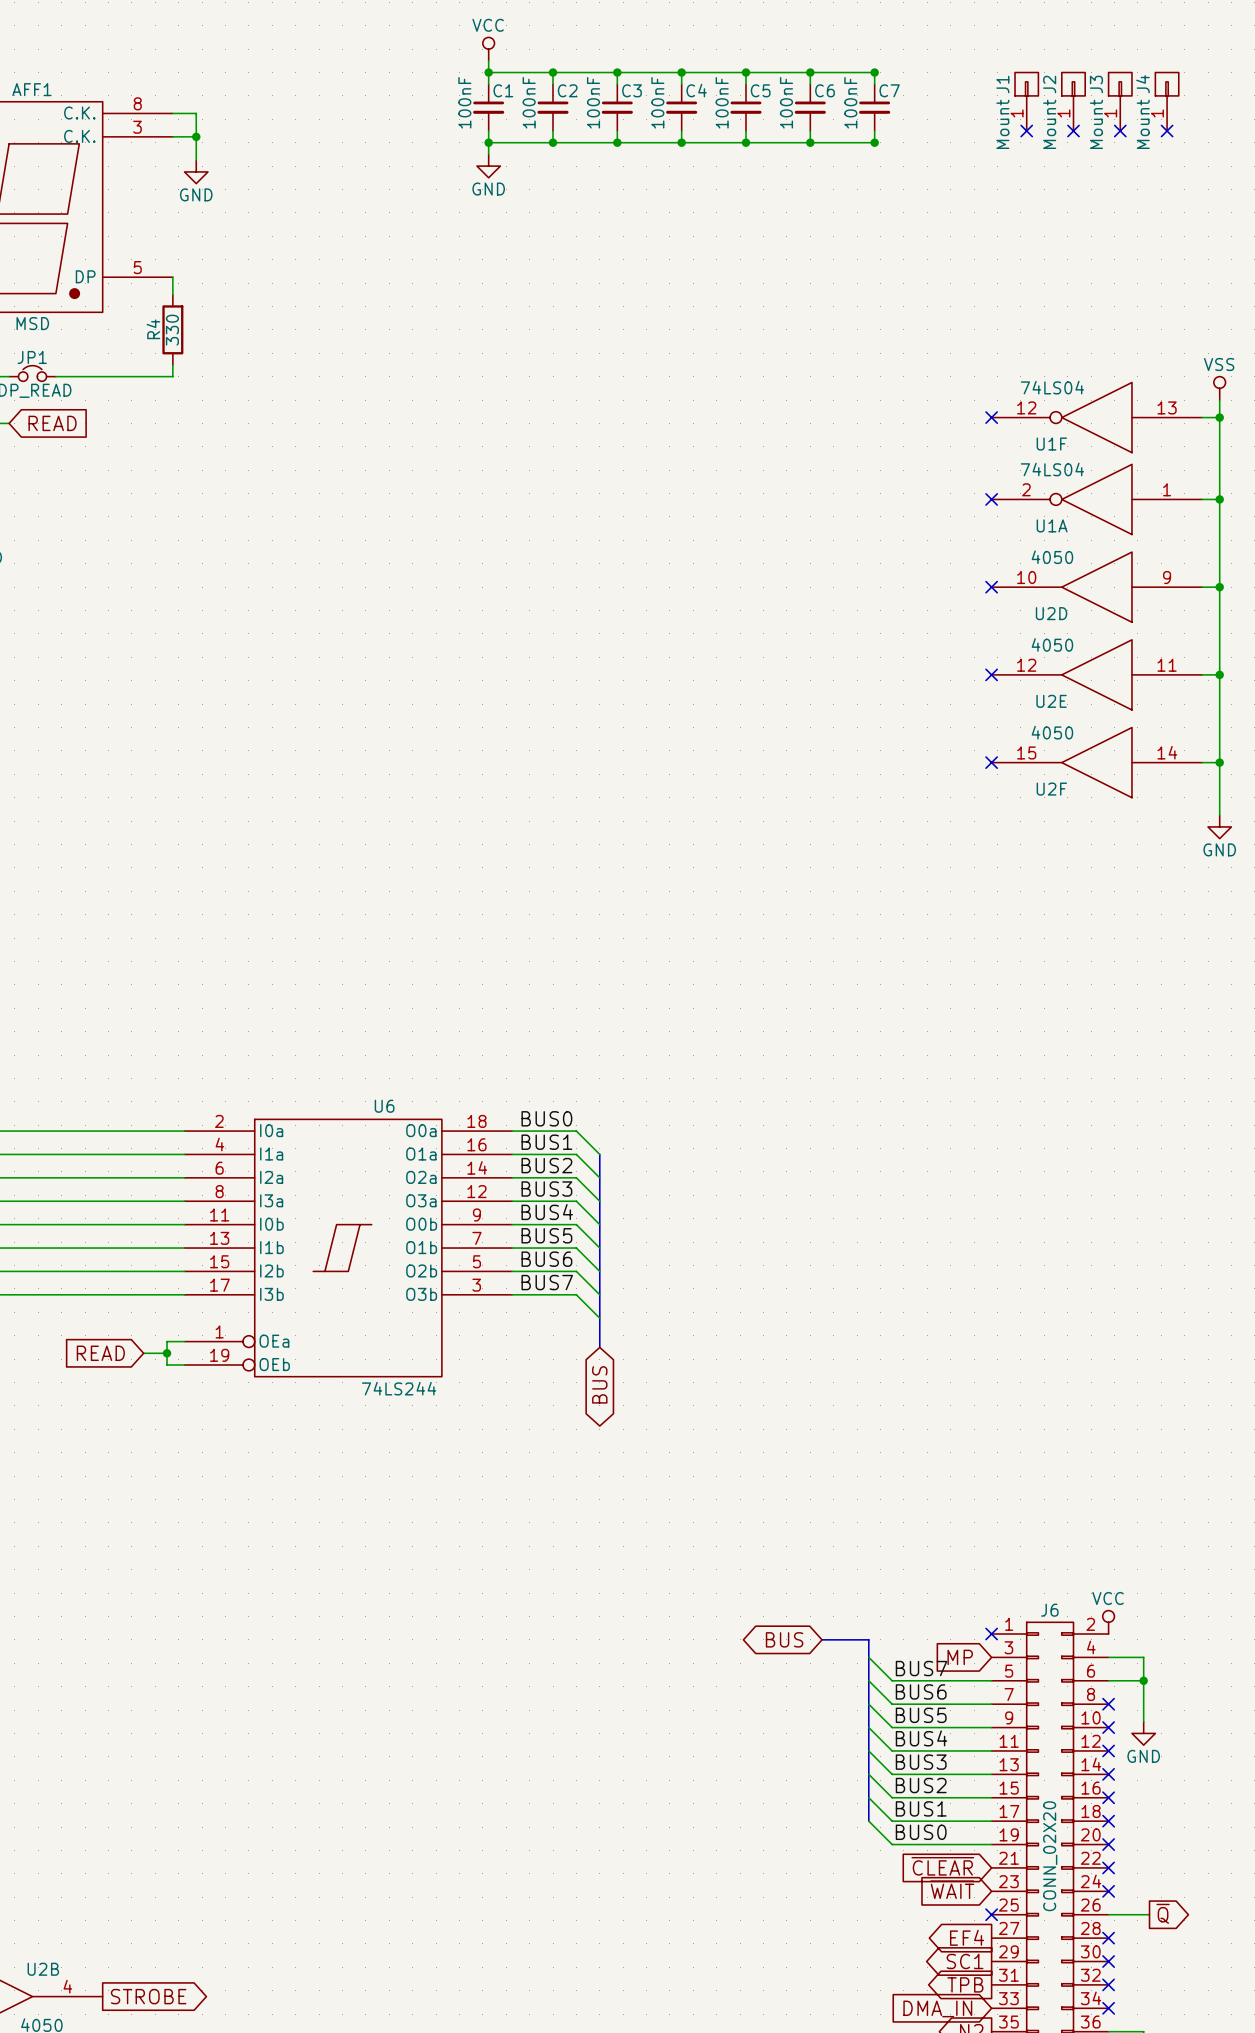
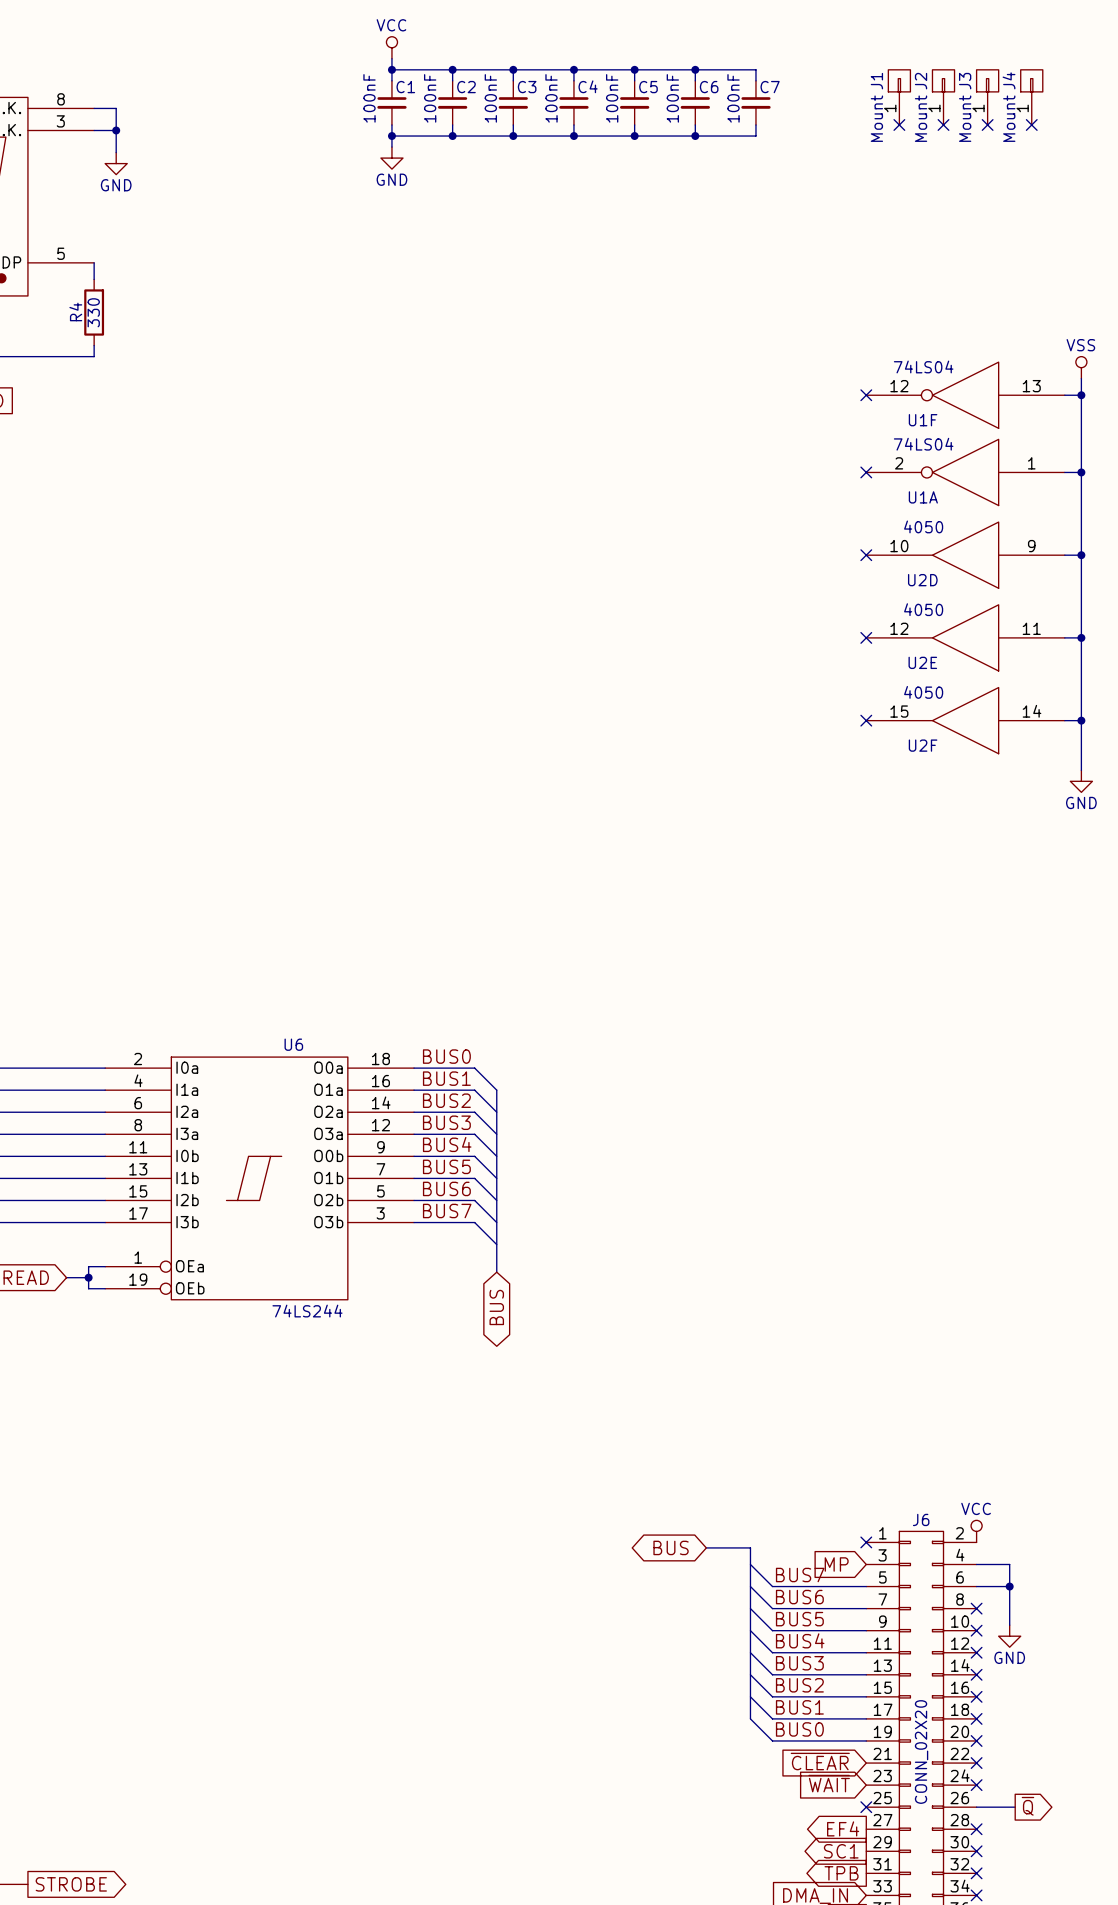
junction: (874, 72) -> none
junction: (874, 142) -> none

